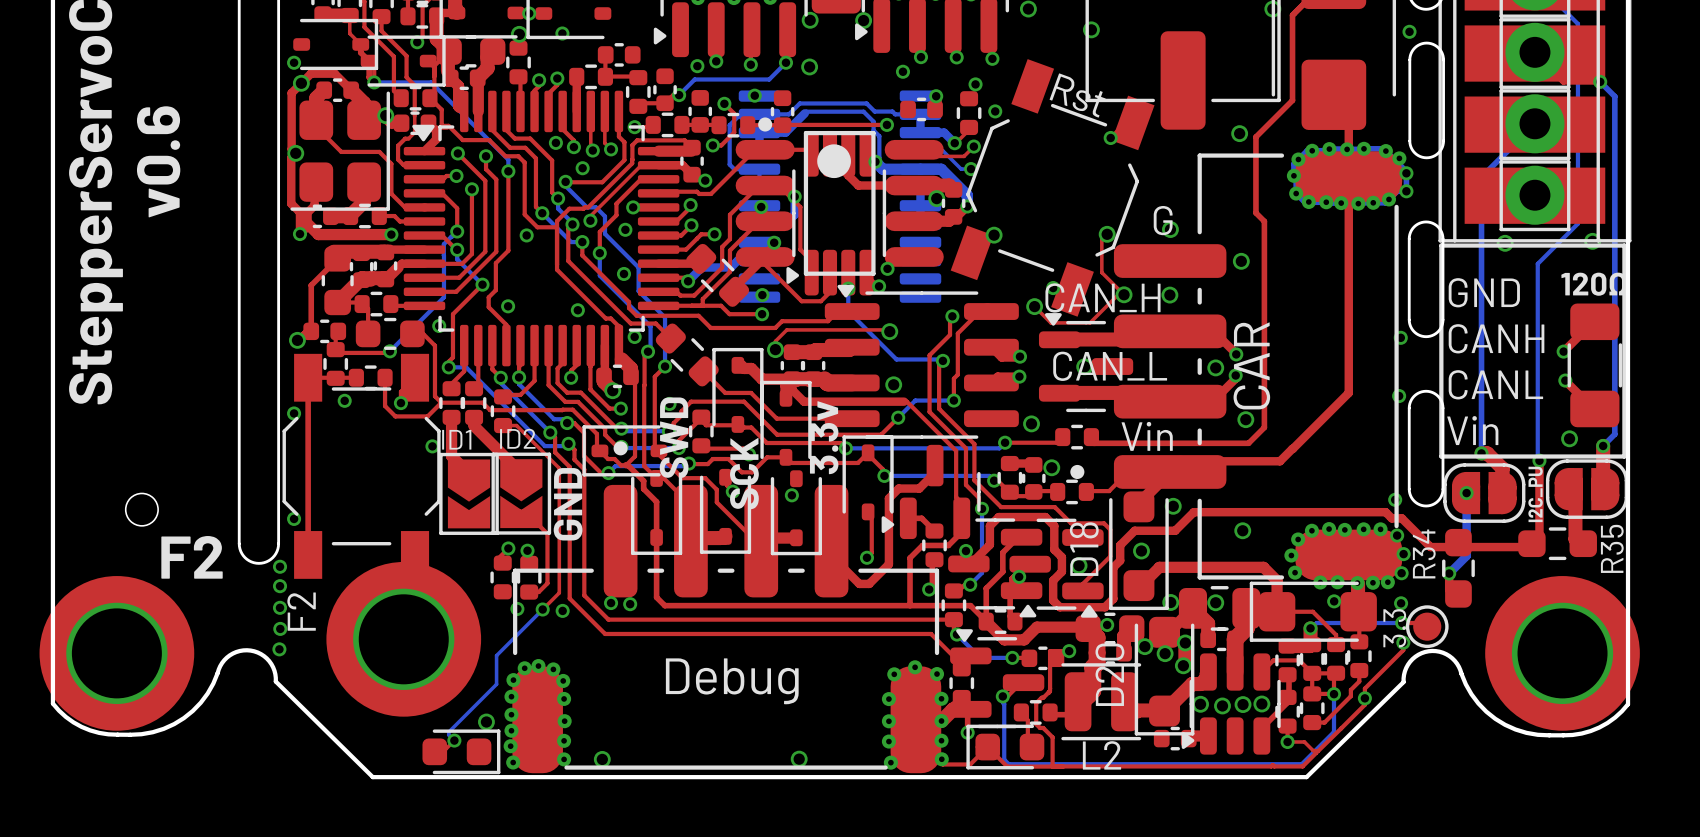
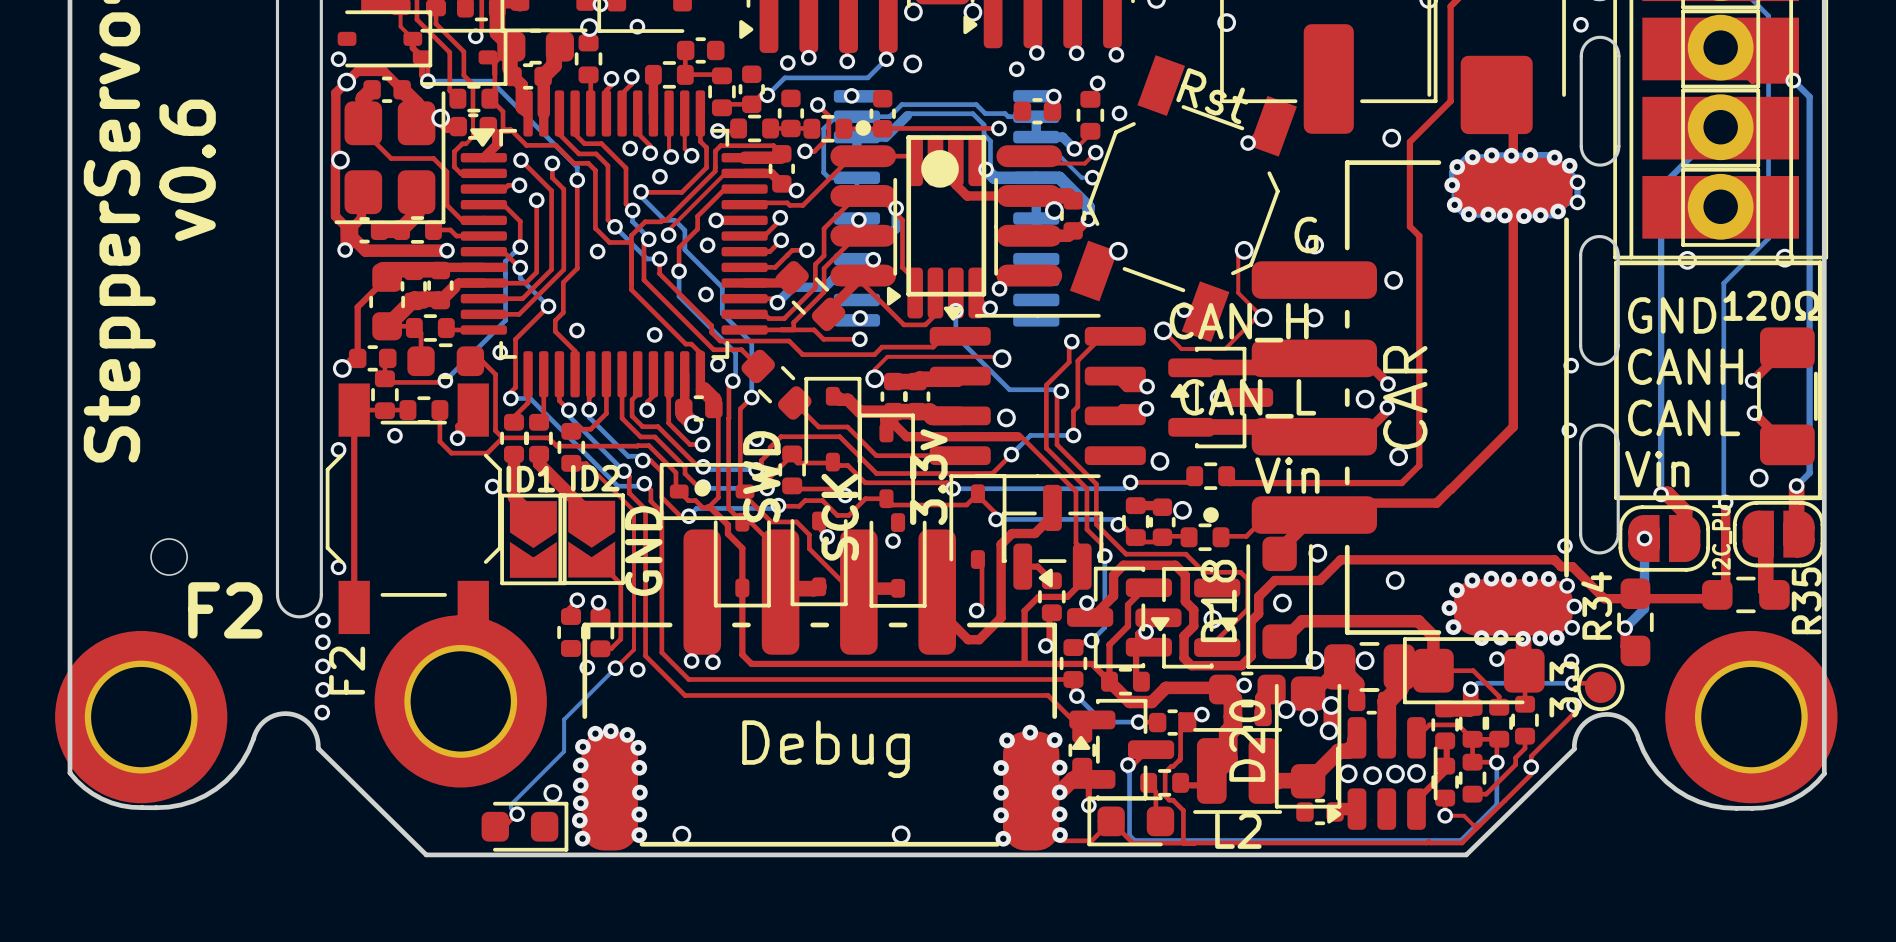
part footprint: [1038, 313, 1134, 413] -> [1168, 346, 1274, 449]
part footprint: [881, 444, 981, 540] -> [1001, 484, 1104, 590]
part footprint: [948, 518, 1043, 618] -> [1067, 566, 1172, 669]
part footprint: [1009, 518, 1104, 618] -> [1135, 567, 1241, 669]
part footprint: [950, 629, 1045, 729] -> [1069, 698, 1175, 801]

